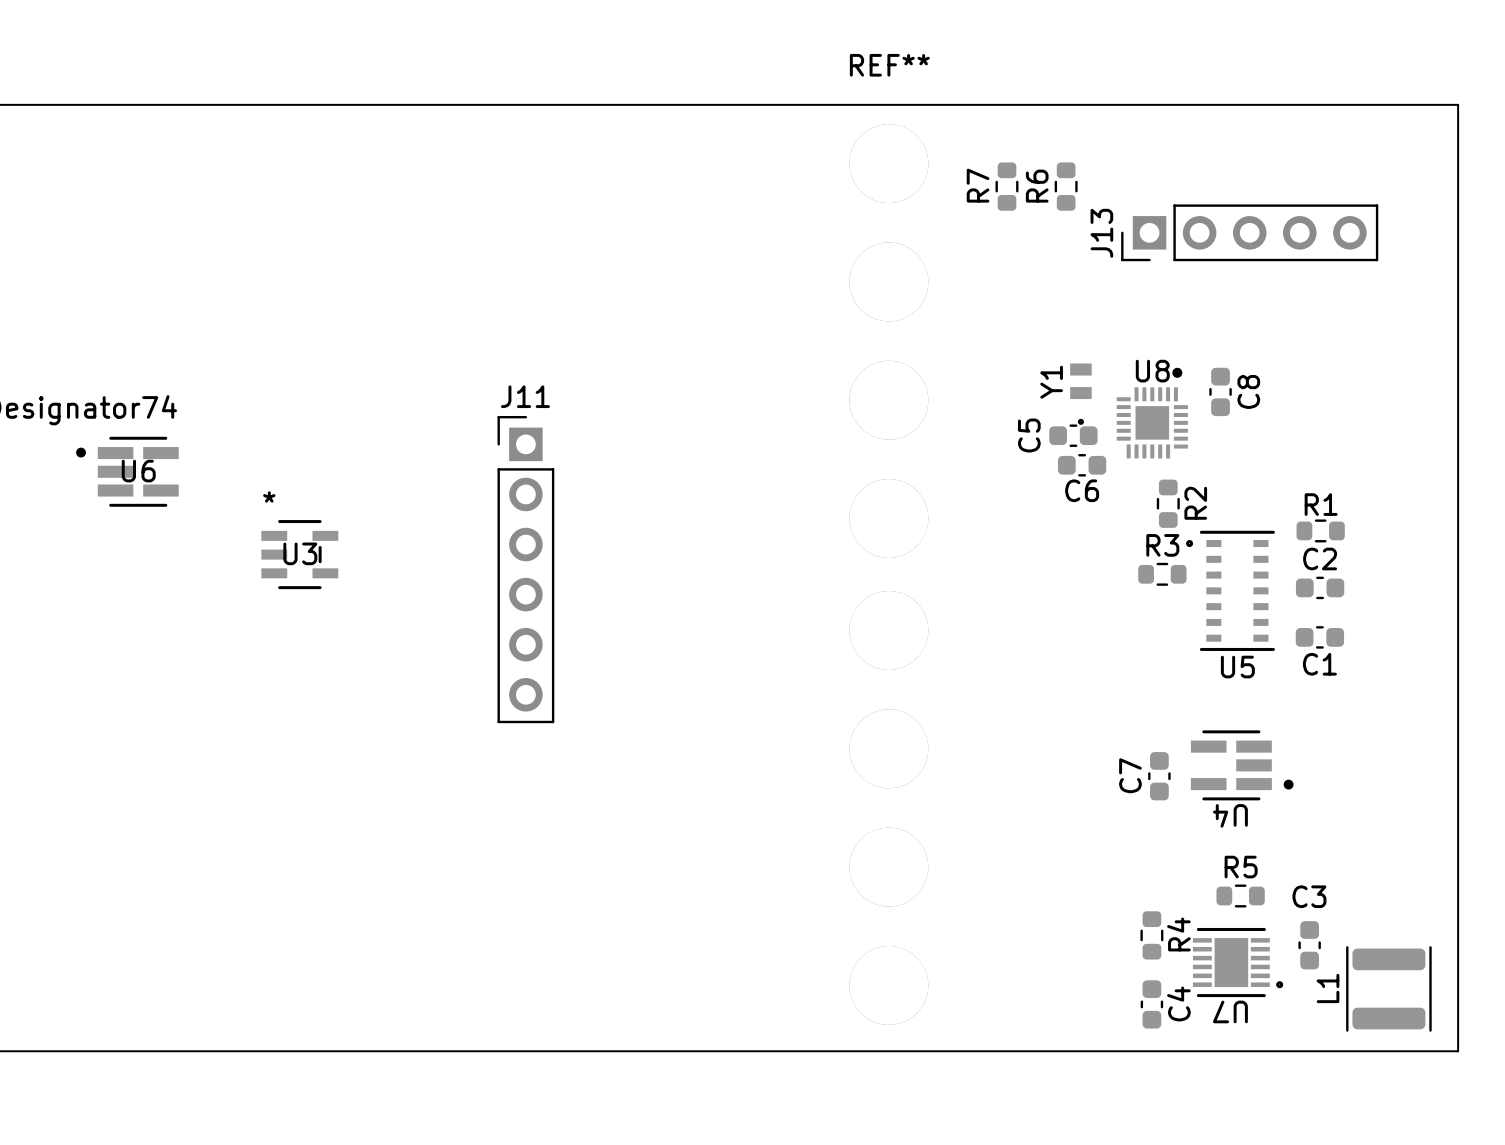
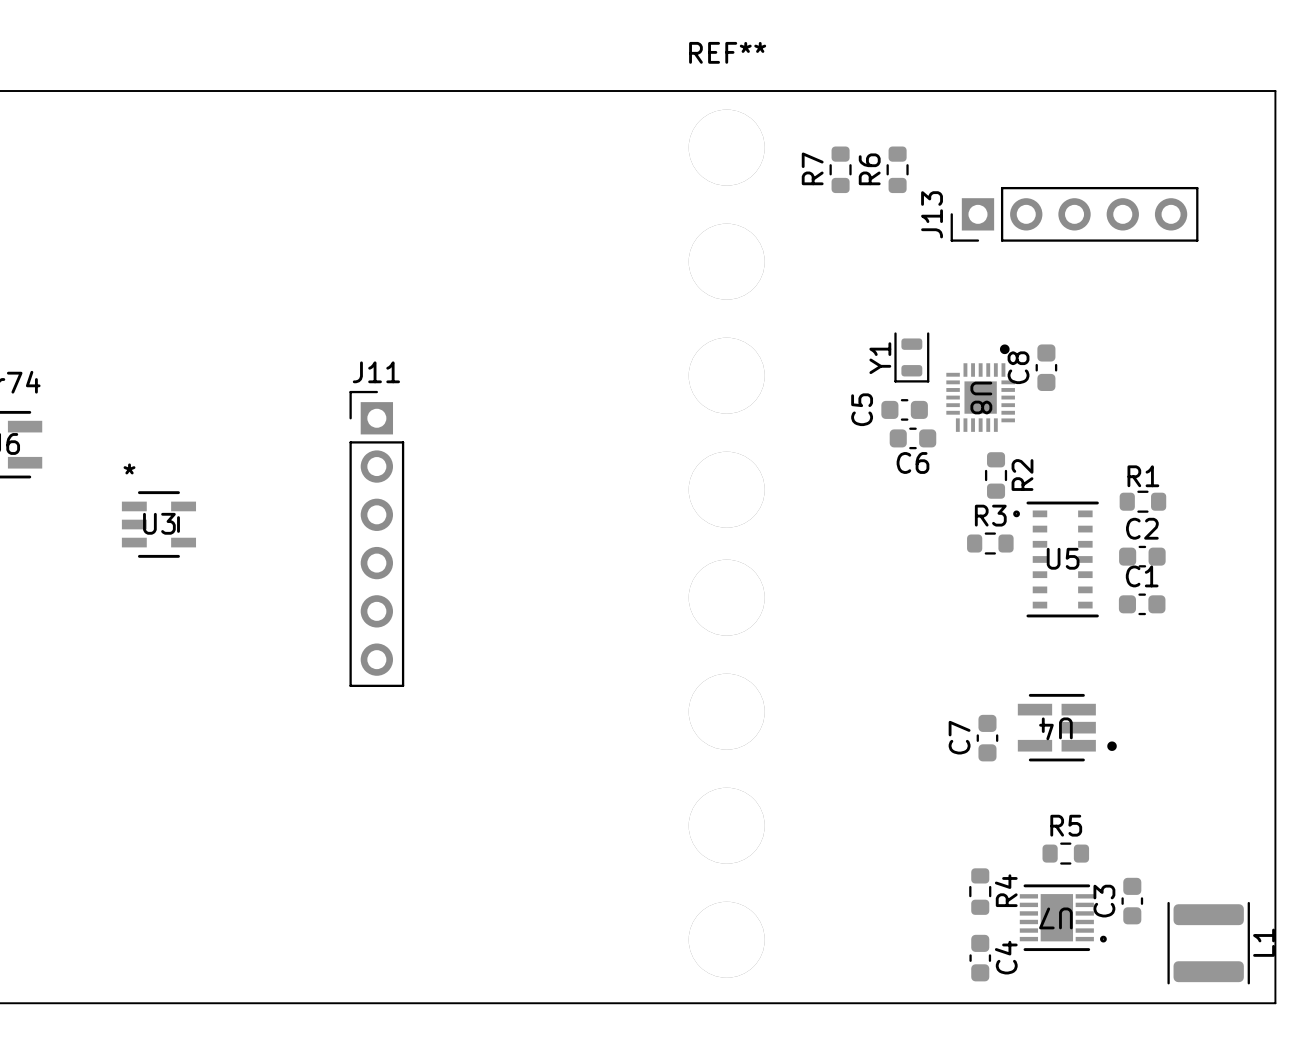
Y1 footprint: [1070, 363, 1092, 425] -> [894, 332, 930, 383]
U8 name rotation: 0° (1152, 371) -> 90° clockwise (981, 398)
U8 name position: U8 (1152, 371) -> U8 (981, 398)
C8 name position: C8 (1248, 391) -> C8 (1018, 367)
C1 name position: C1 (1319, 664) -> C1 (1142, 576)
U5 name position: U5 (1237, 667) -> U5 (1063, 558)
U4 name position: U4 (1230, 815) -> U4 (1055, 728)
C3 name rotation: 0° (1309, 896) -> 90° counterclockwise (1104, 901)
C3 name position: C3 (1309, 896) -> C3 (1104, 901)
L1 name position: L1 (1328, 988) -> L1 (1264, 942)
U7 name position: U7 (1230, 1011) -> U7 (1055, 918)

